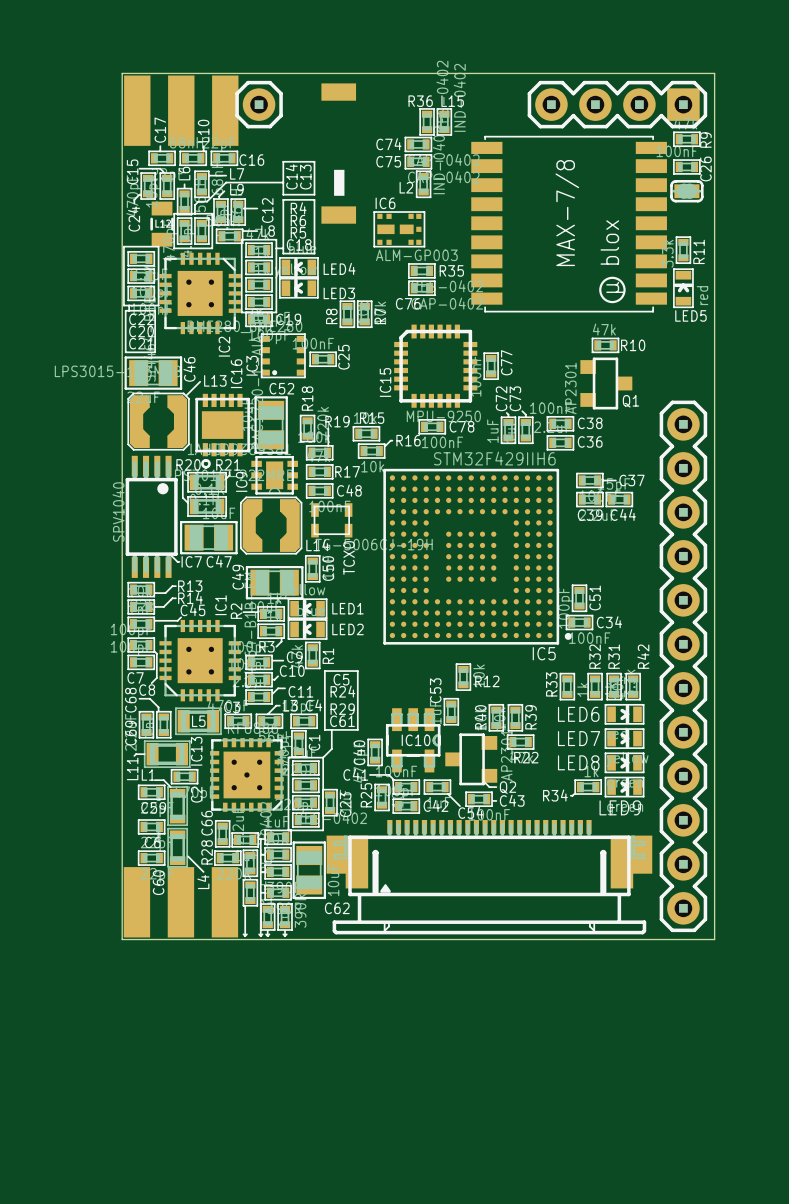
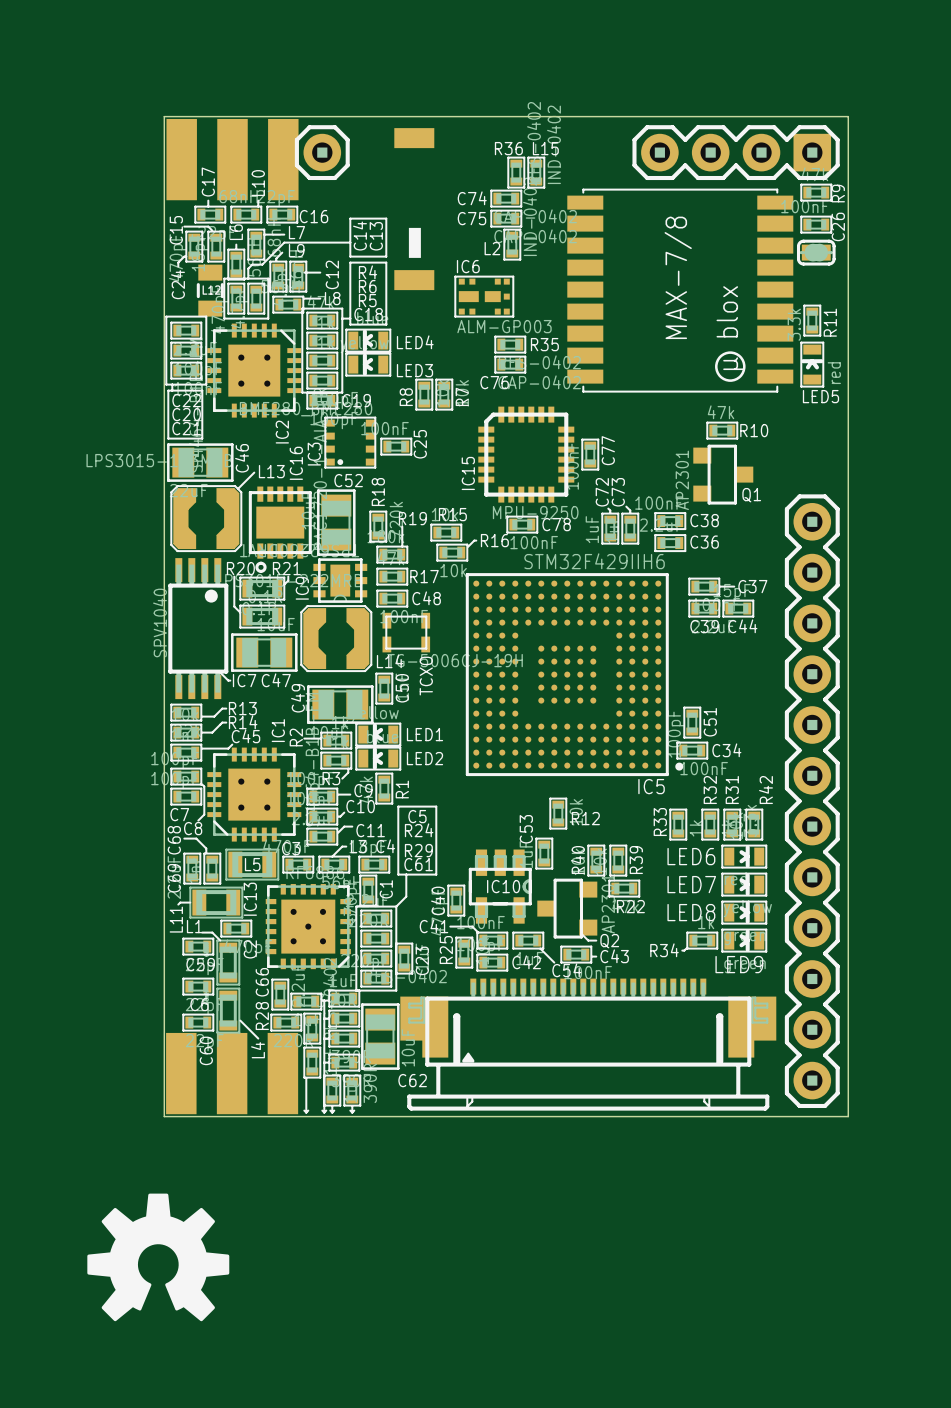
drawing: none -> [87, 1193, 230, 1322]

